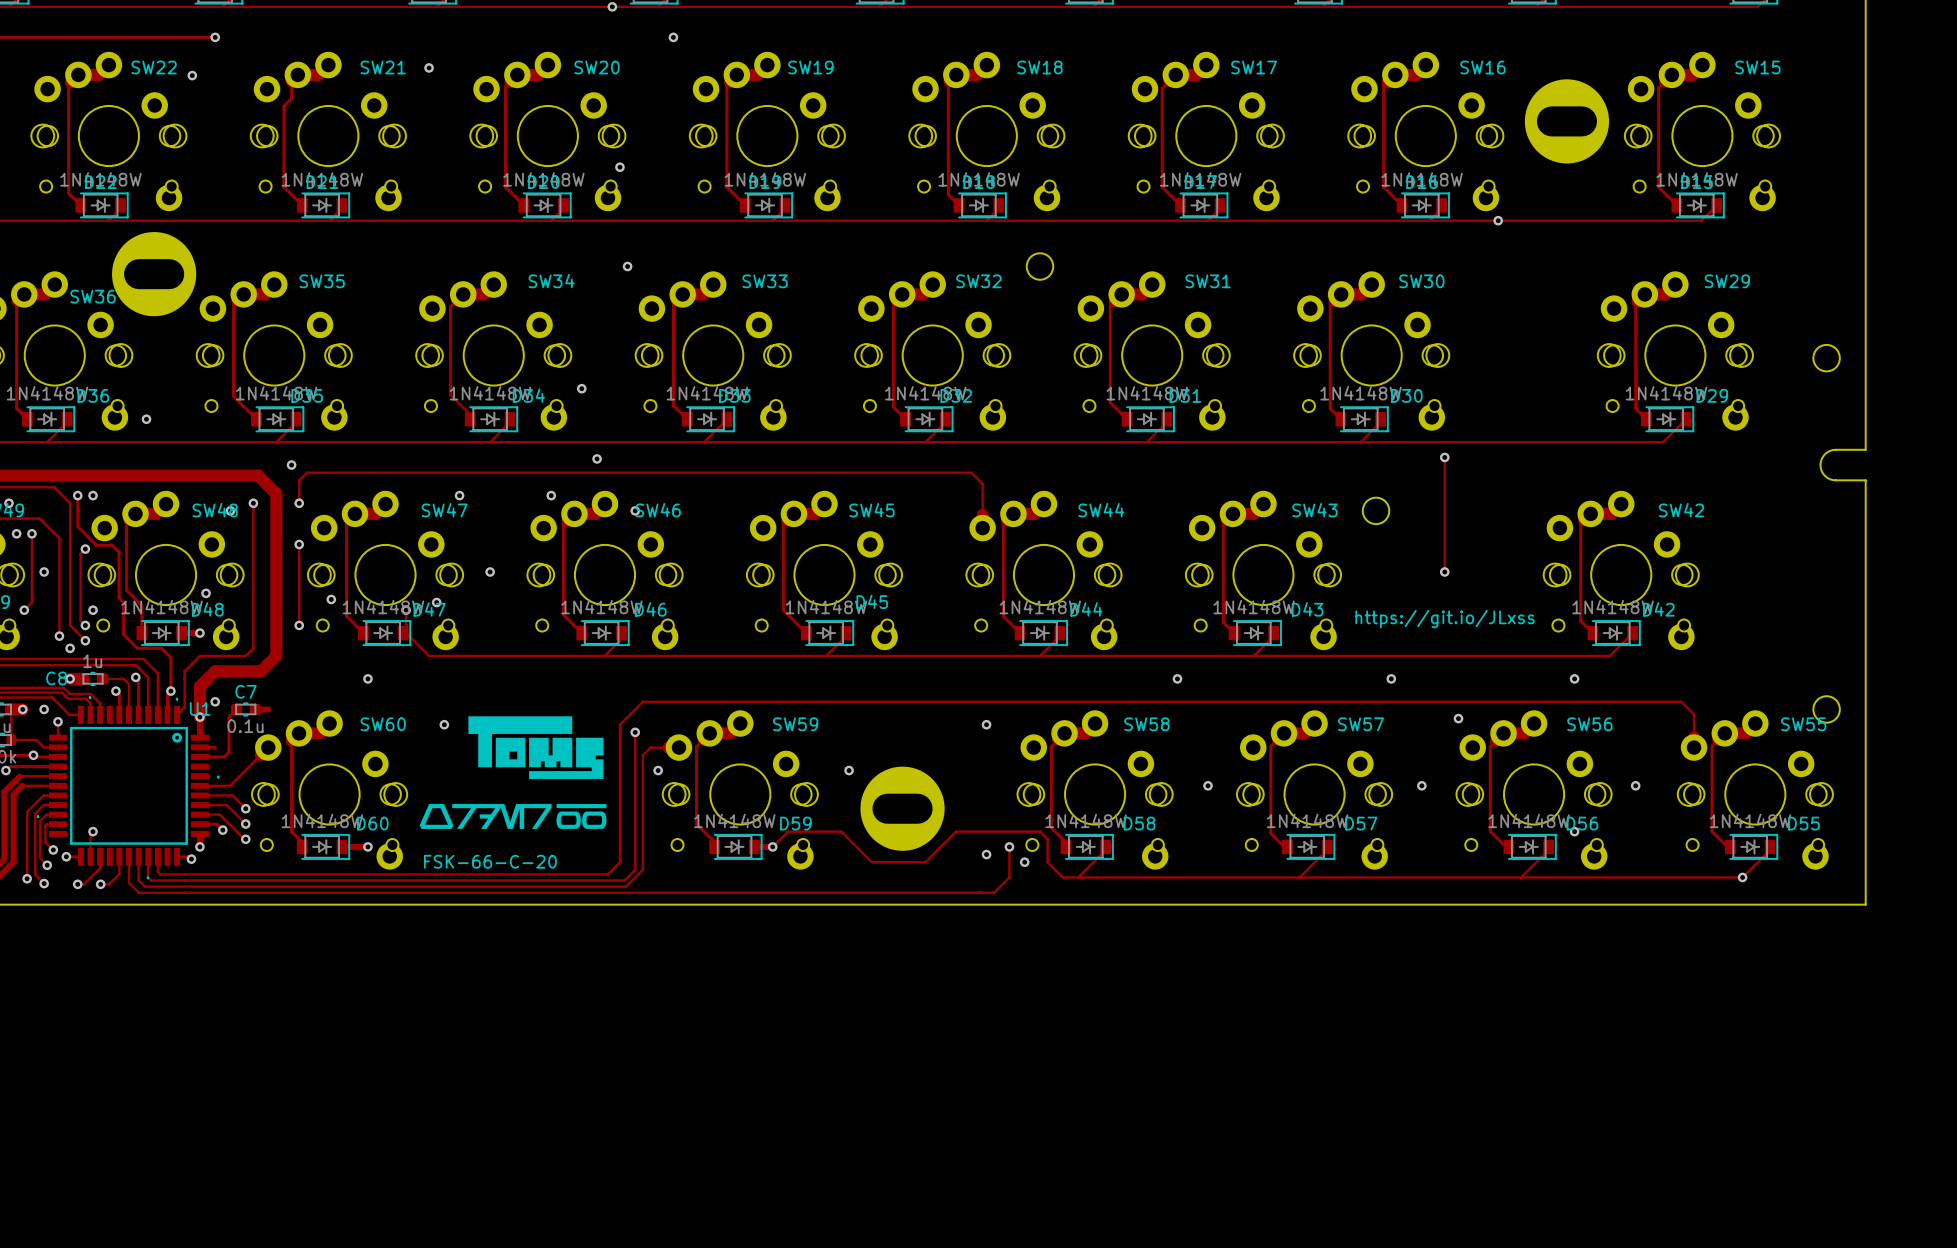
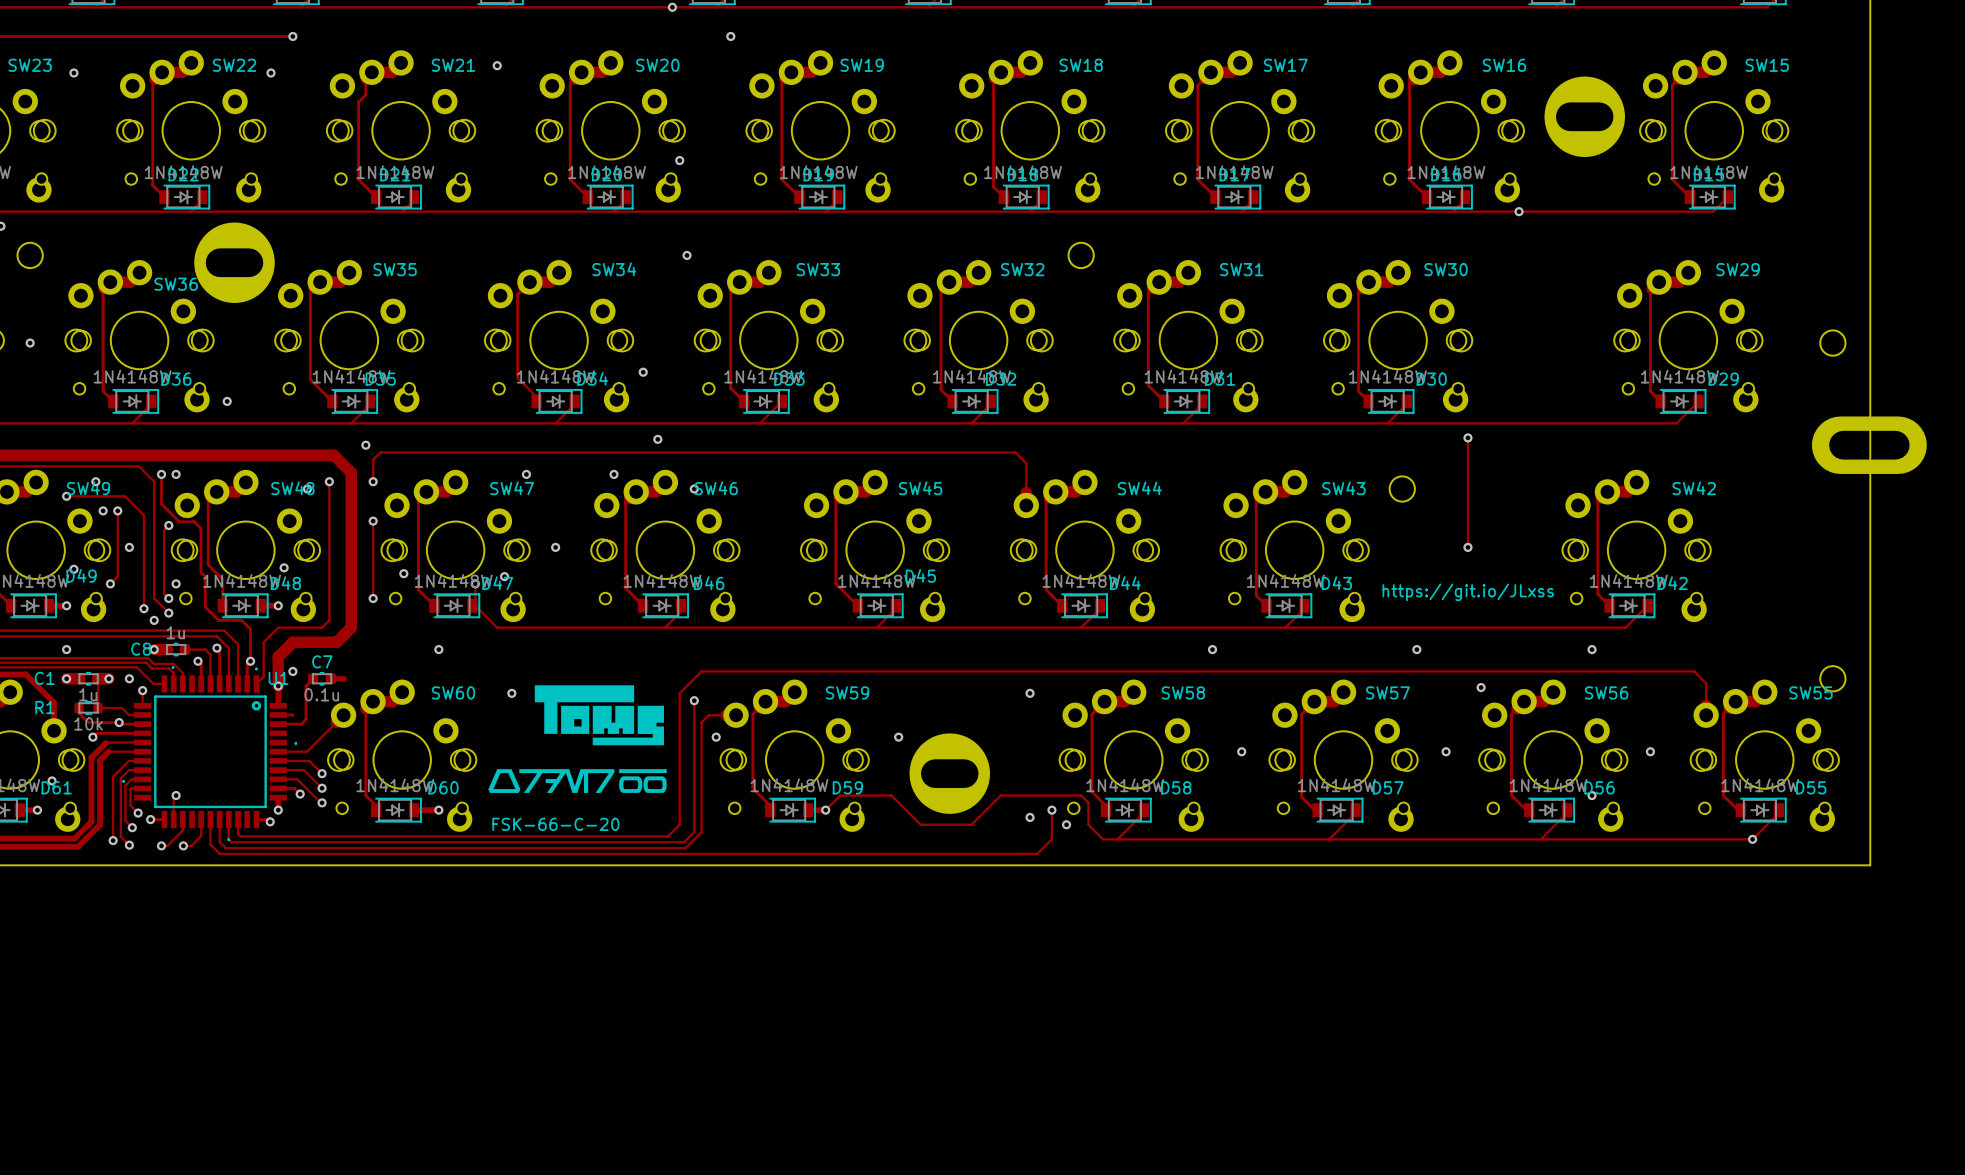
board edge: (1865, 449) (1831, 450) (1823, 455) (1820, 465) (1823, 474) (1831, 479) (1865, 480) -> (1870, 430) (1870, 459)
part: none -> (1869, 445)

